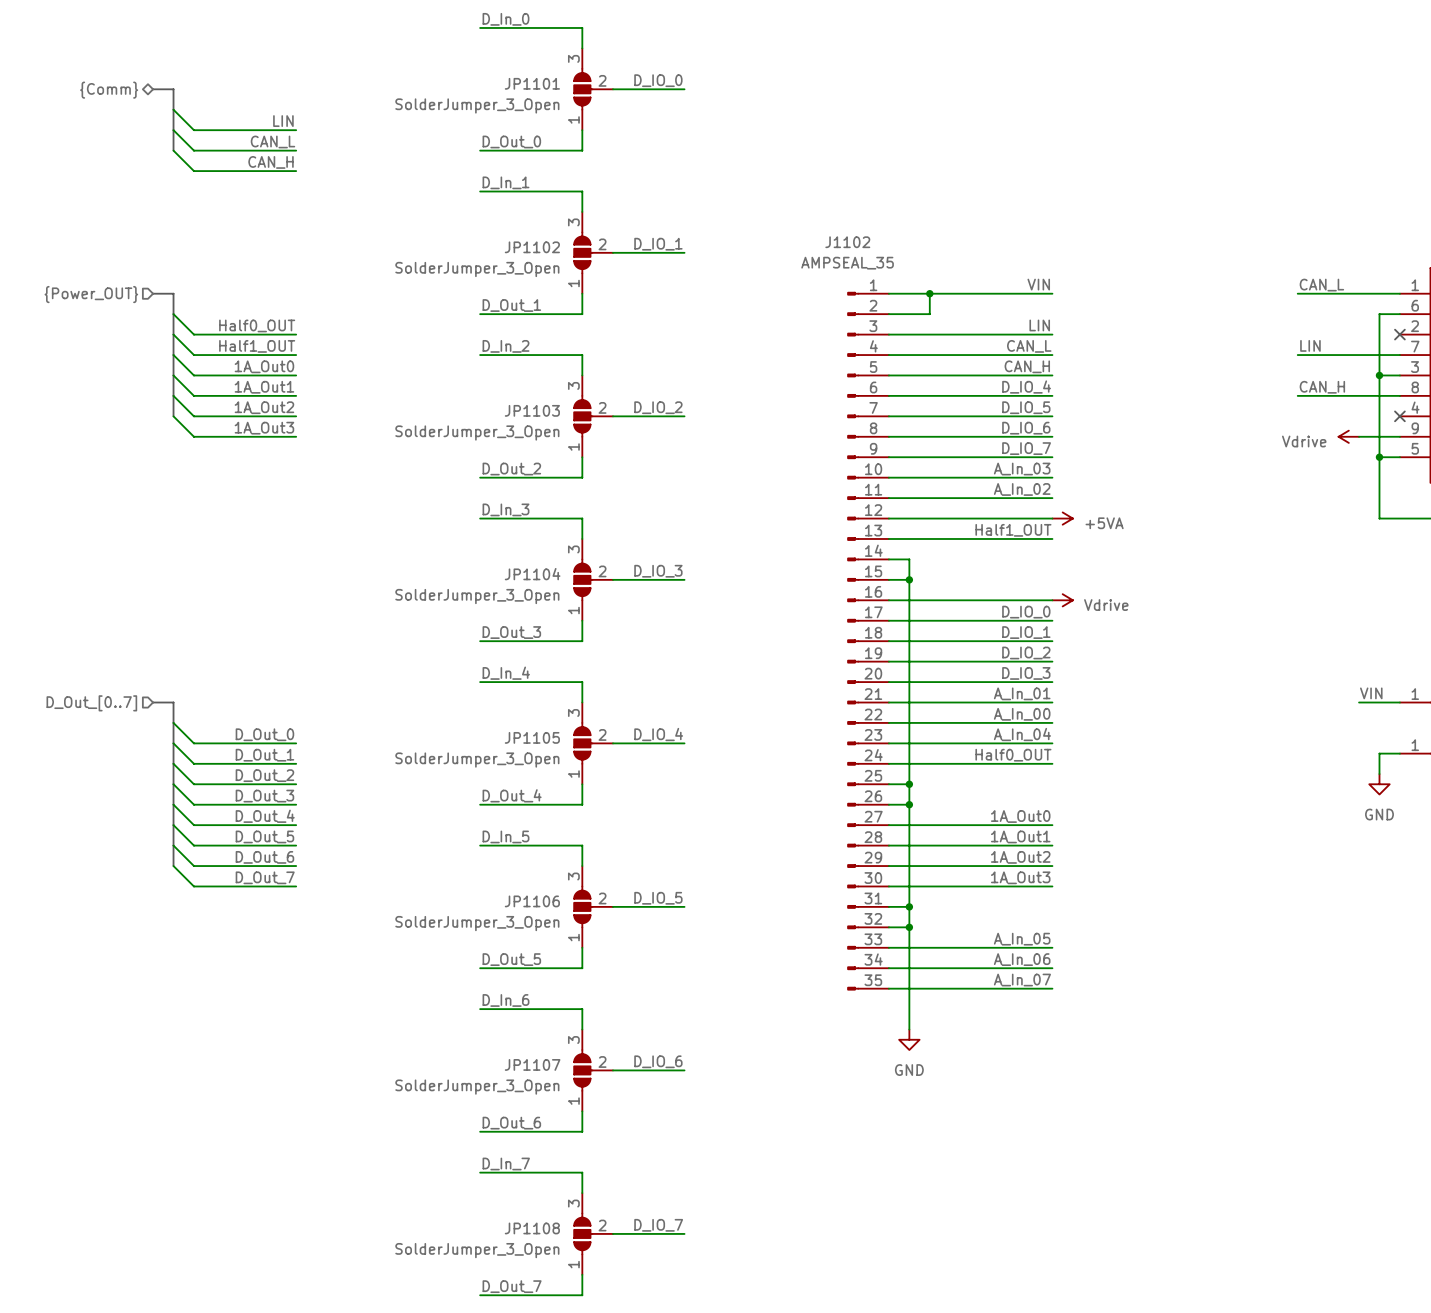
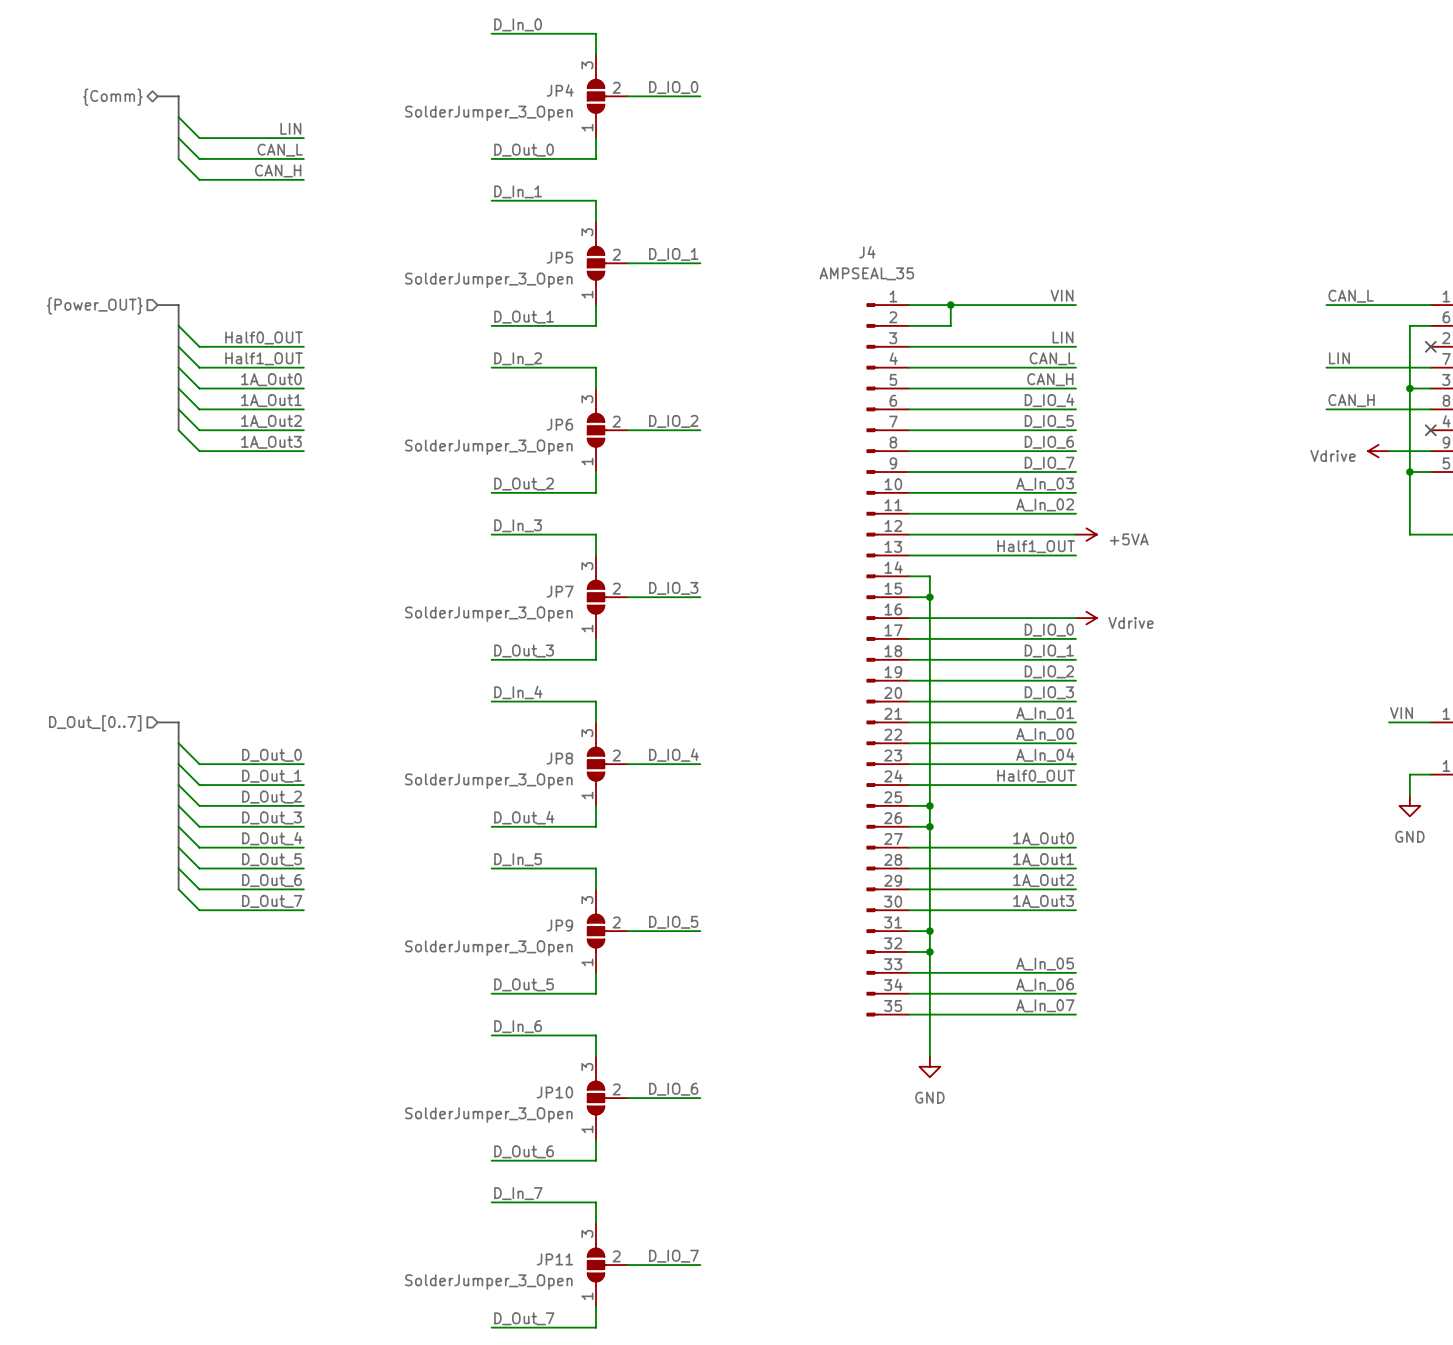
JP1101 name: JP1101 (532, 83) -> JP4 (560, 90)
J1102 name: J1102 (847, 242) -> J4 (867, 252)
JP1102 name: JP1102 (532, 247) -> JP5 (559, 257)
JP1103 name: JP1103 (532, 410) -> JP6 (559, 424)
JP1104 name: JP1104 (532, 574) -> JP7 (560, 591)
JP1105 name: JP1105 (532, 737) -> JP8 (559, 758)
JP1106 name: JP1106 (532, 901) -> JP9 (559, 925)
JP1107 name: JP1107 (532, 1064) -> JP10 (554, 1092)
JP1108 name: JP1108 (532, 1228) -> JP11 (554, 1259)

